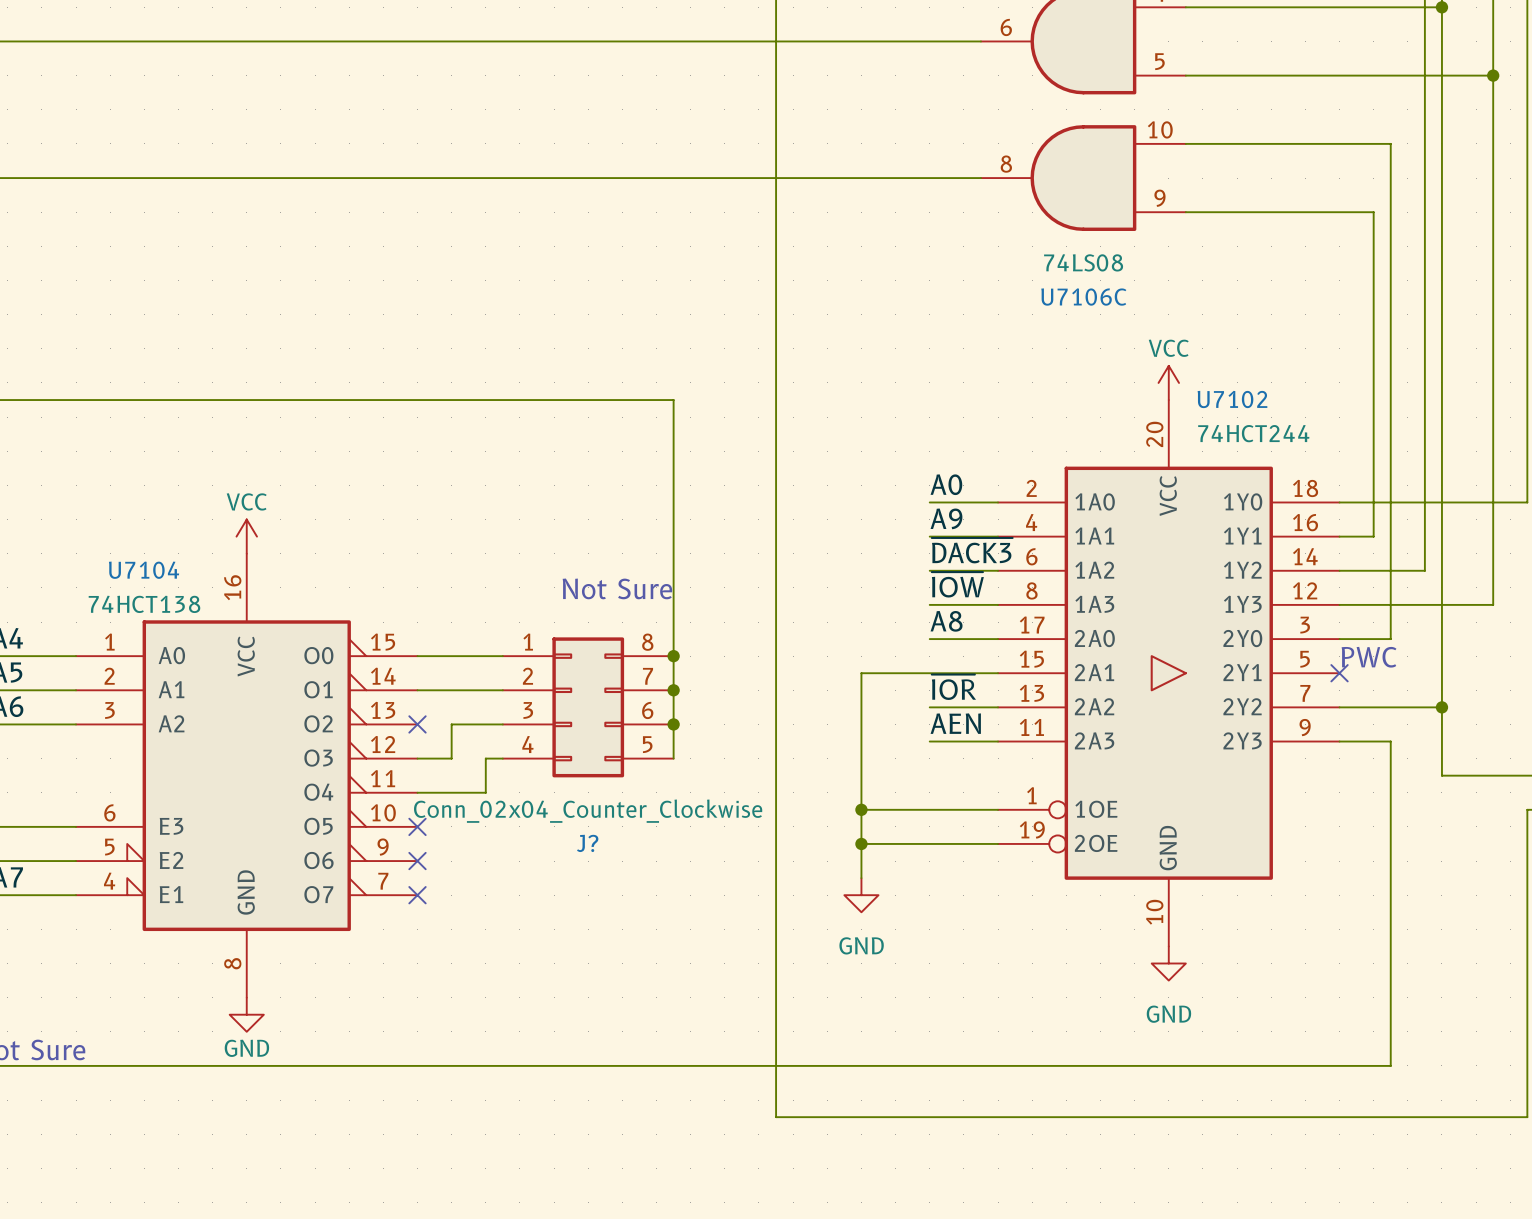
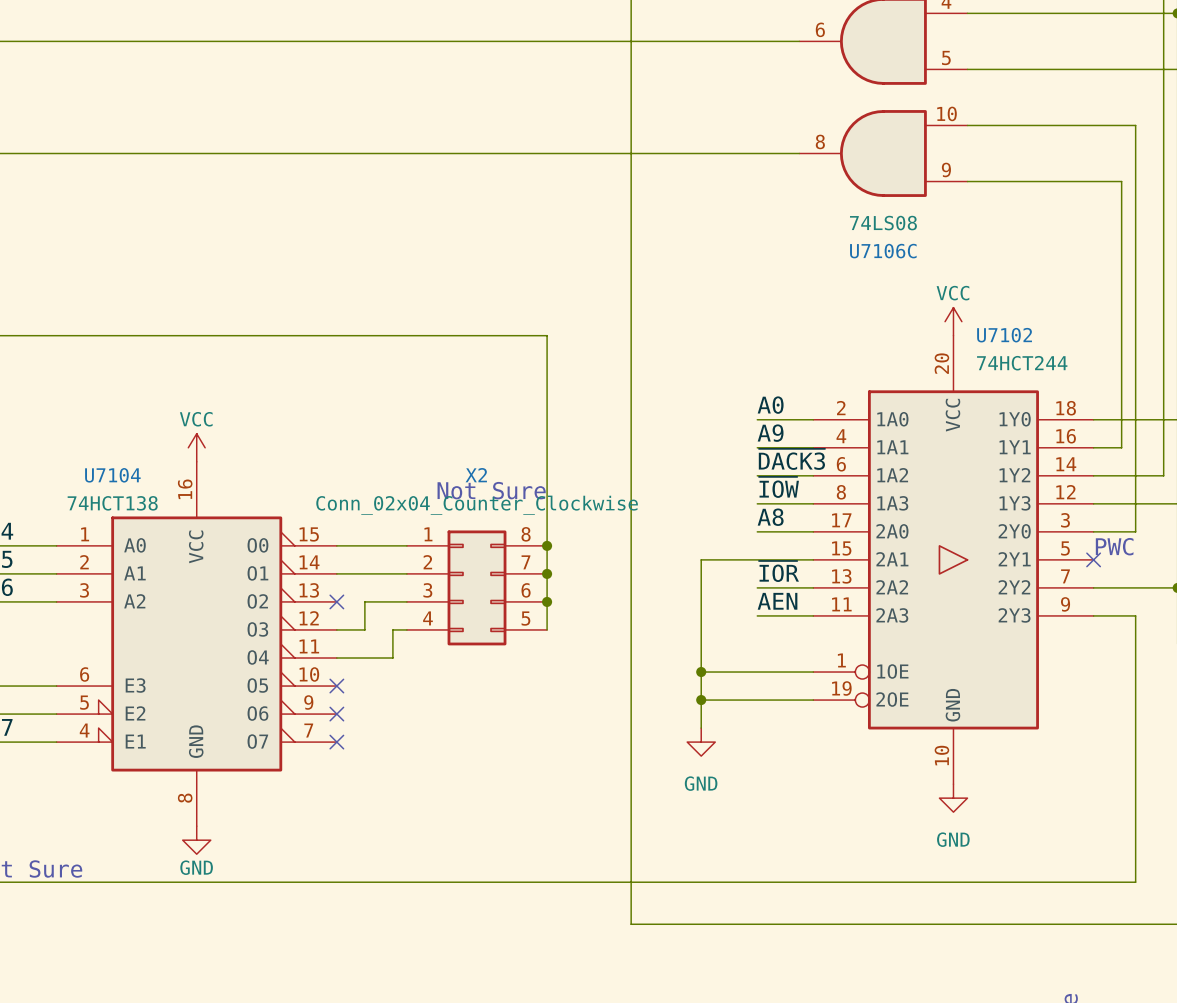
J? value position: Conn_02x04_Counter_Clockwise (588, 811) -> Conn_02x04_Counter_Clockwise (477, 505)
J? name: J? (587, 843) -> X2 (476, 475)

